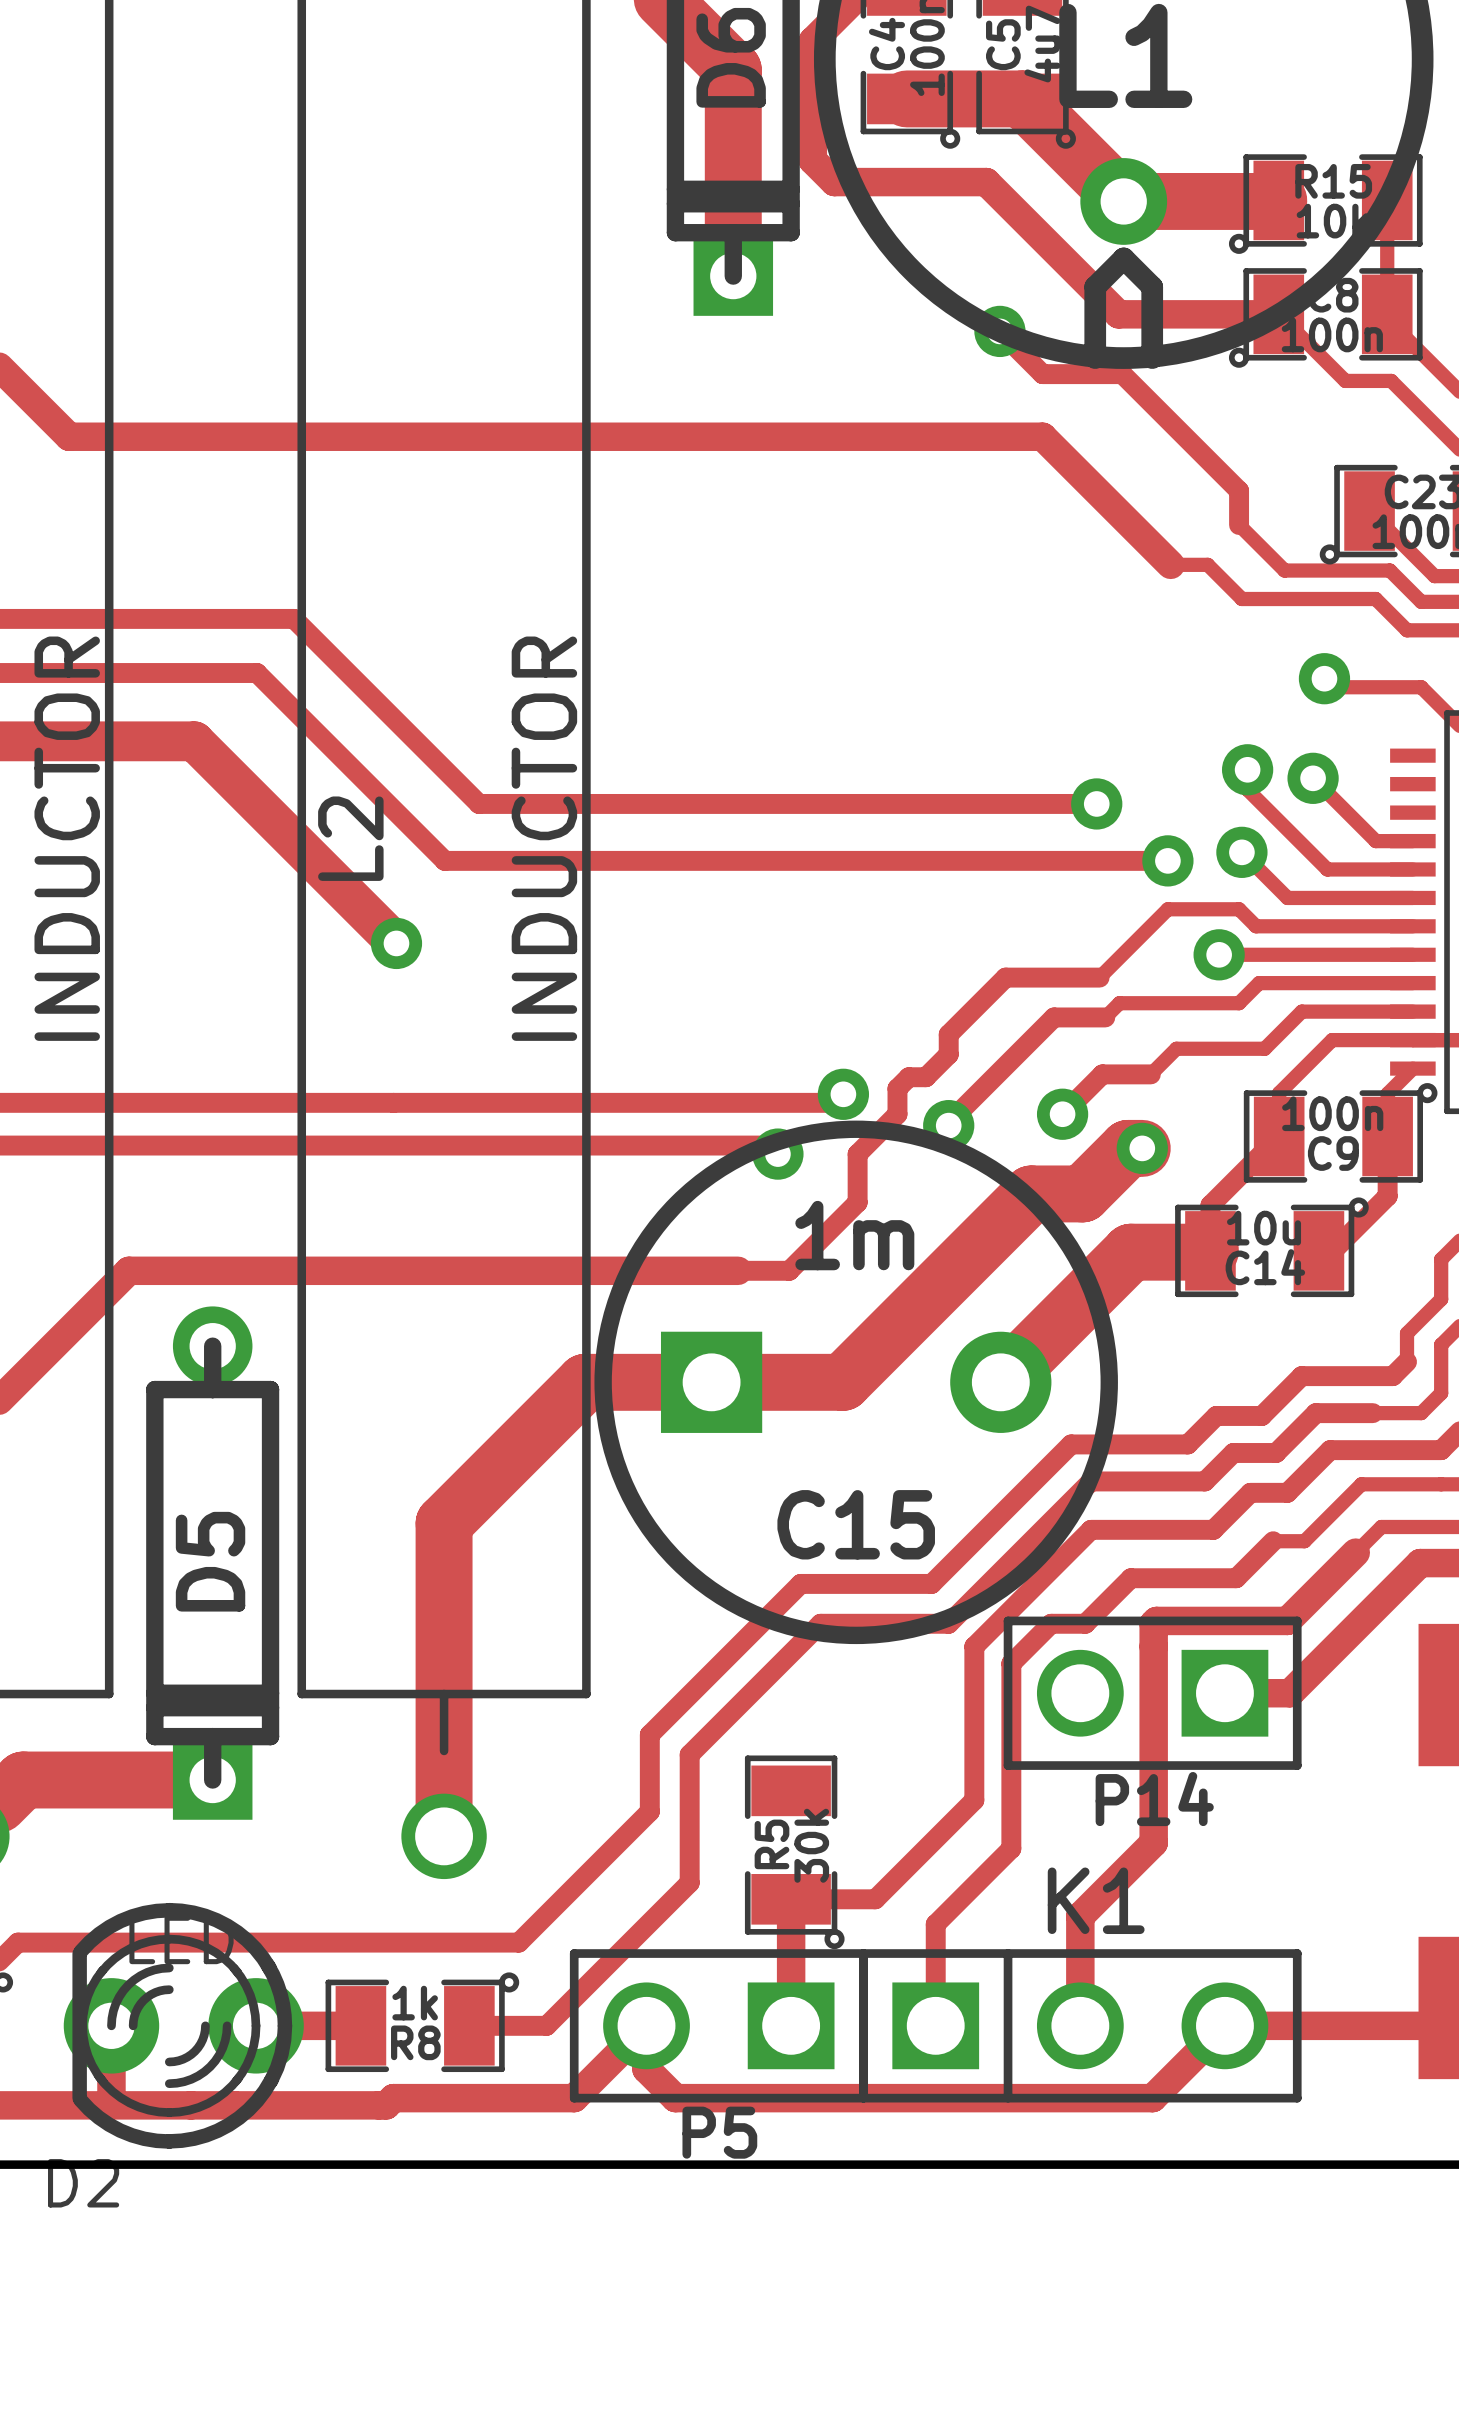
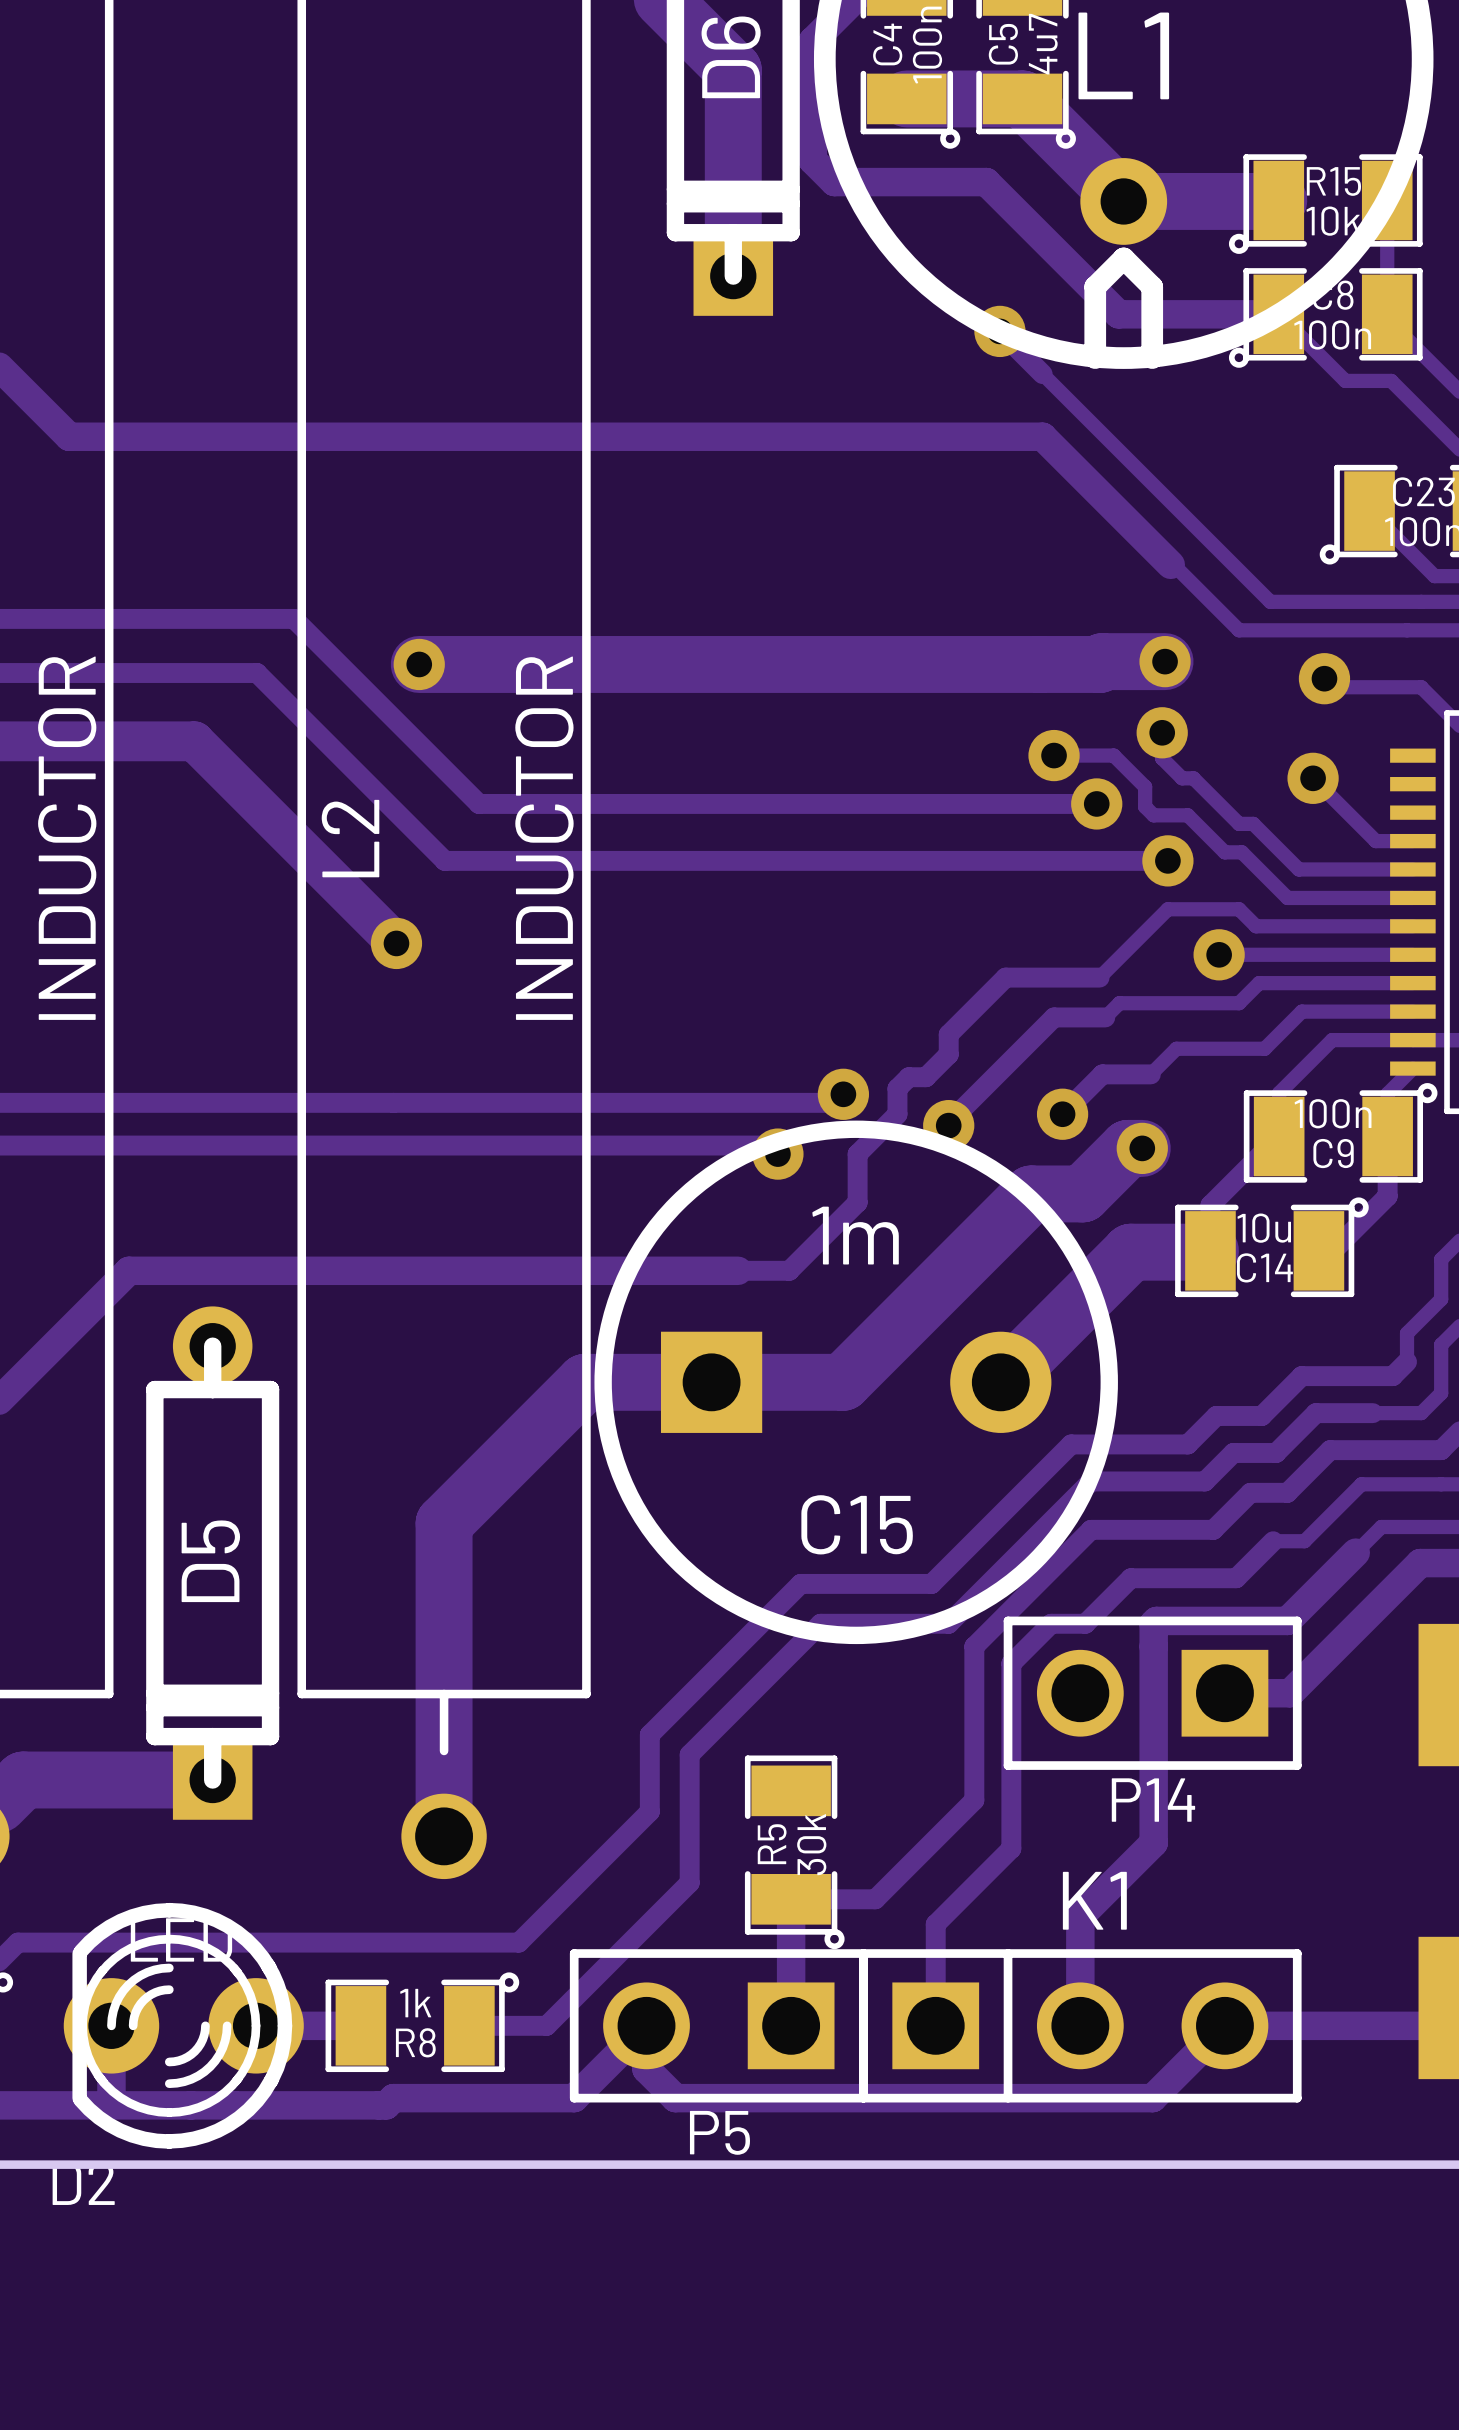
track: (1042, 374) (1122, 374) (1239, 490) (1239, 524) (1284, 570) (1389, 570) (1421, 601) -> (1042, 374) (1270, 601) (1421, 601)
track: (1173, 564) (1207, 564) (1241, 599) (1375, 599) (1407, 630) -> (1173, 564) (1239, 630) (1407, 630)
track: none -> (1165, 661) (1102, 661) (1099, 664) (419, 664)
via: none -> (1165, 661)
via: none -> (419, 664)
via: none -> (1162, 732)
track: none -> (1054, 755) (1113, 755) (1145, 786) (1145, 806) (1153, 815) (1187, 815) (1224, 852) (1241, 852)
via: none -> (1054, 755)
track: (1247, 769) (1247, 789) (1327, 869) -> (1162, 732) (1162, 758) (1182, 778) (1193, 778) (1239, 823) (1253, 823) (1298, 869) (1327, 869)
via: (1247, 769) -> none
via: (1241, 852) -> none

